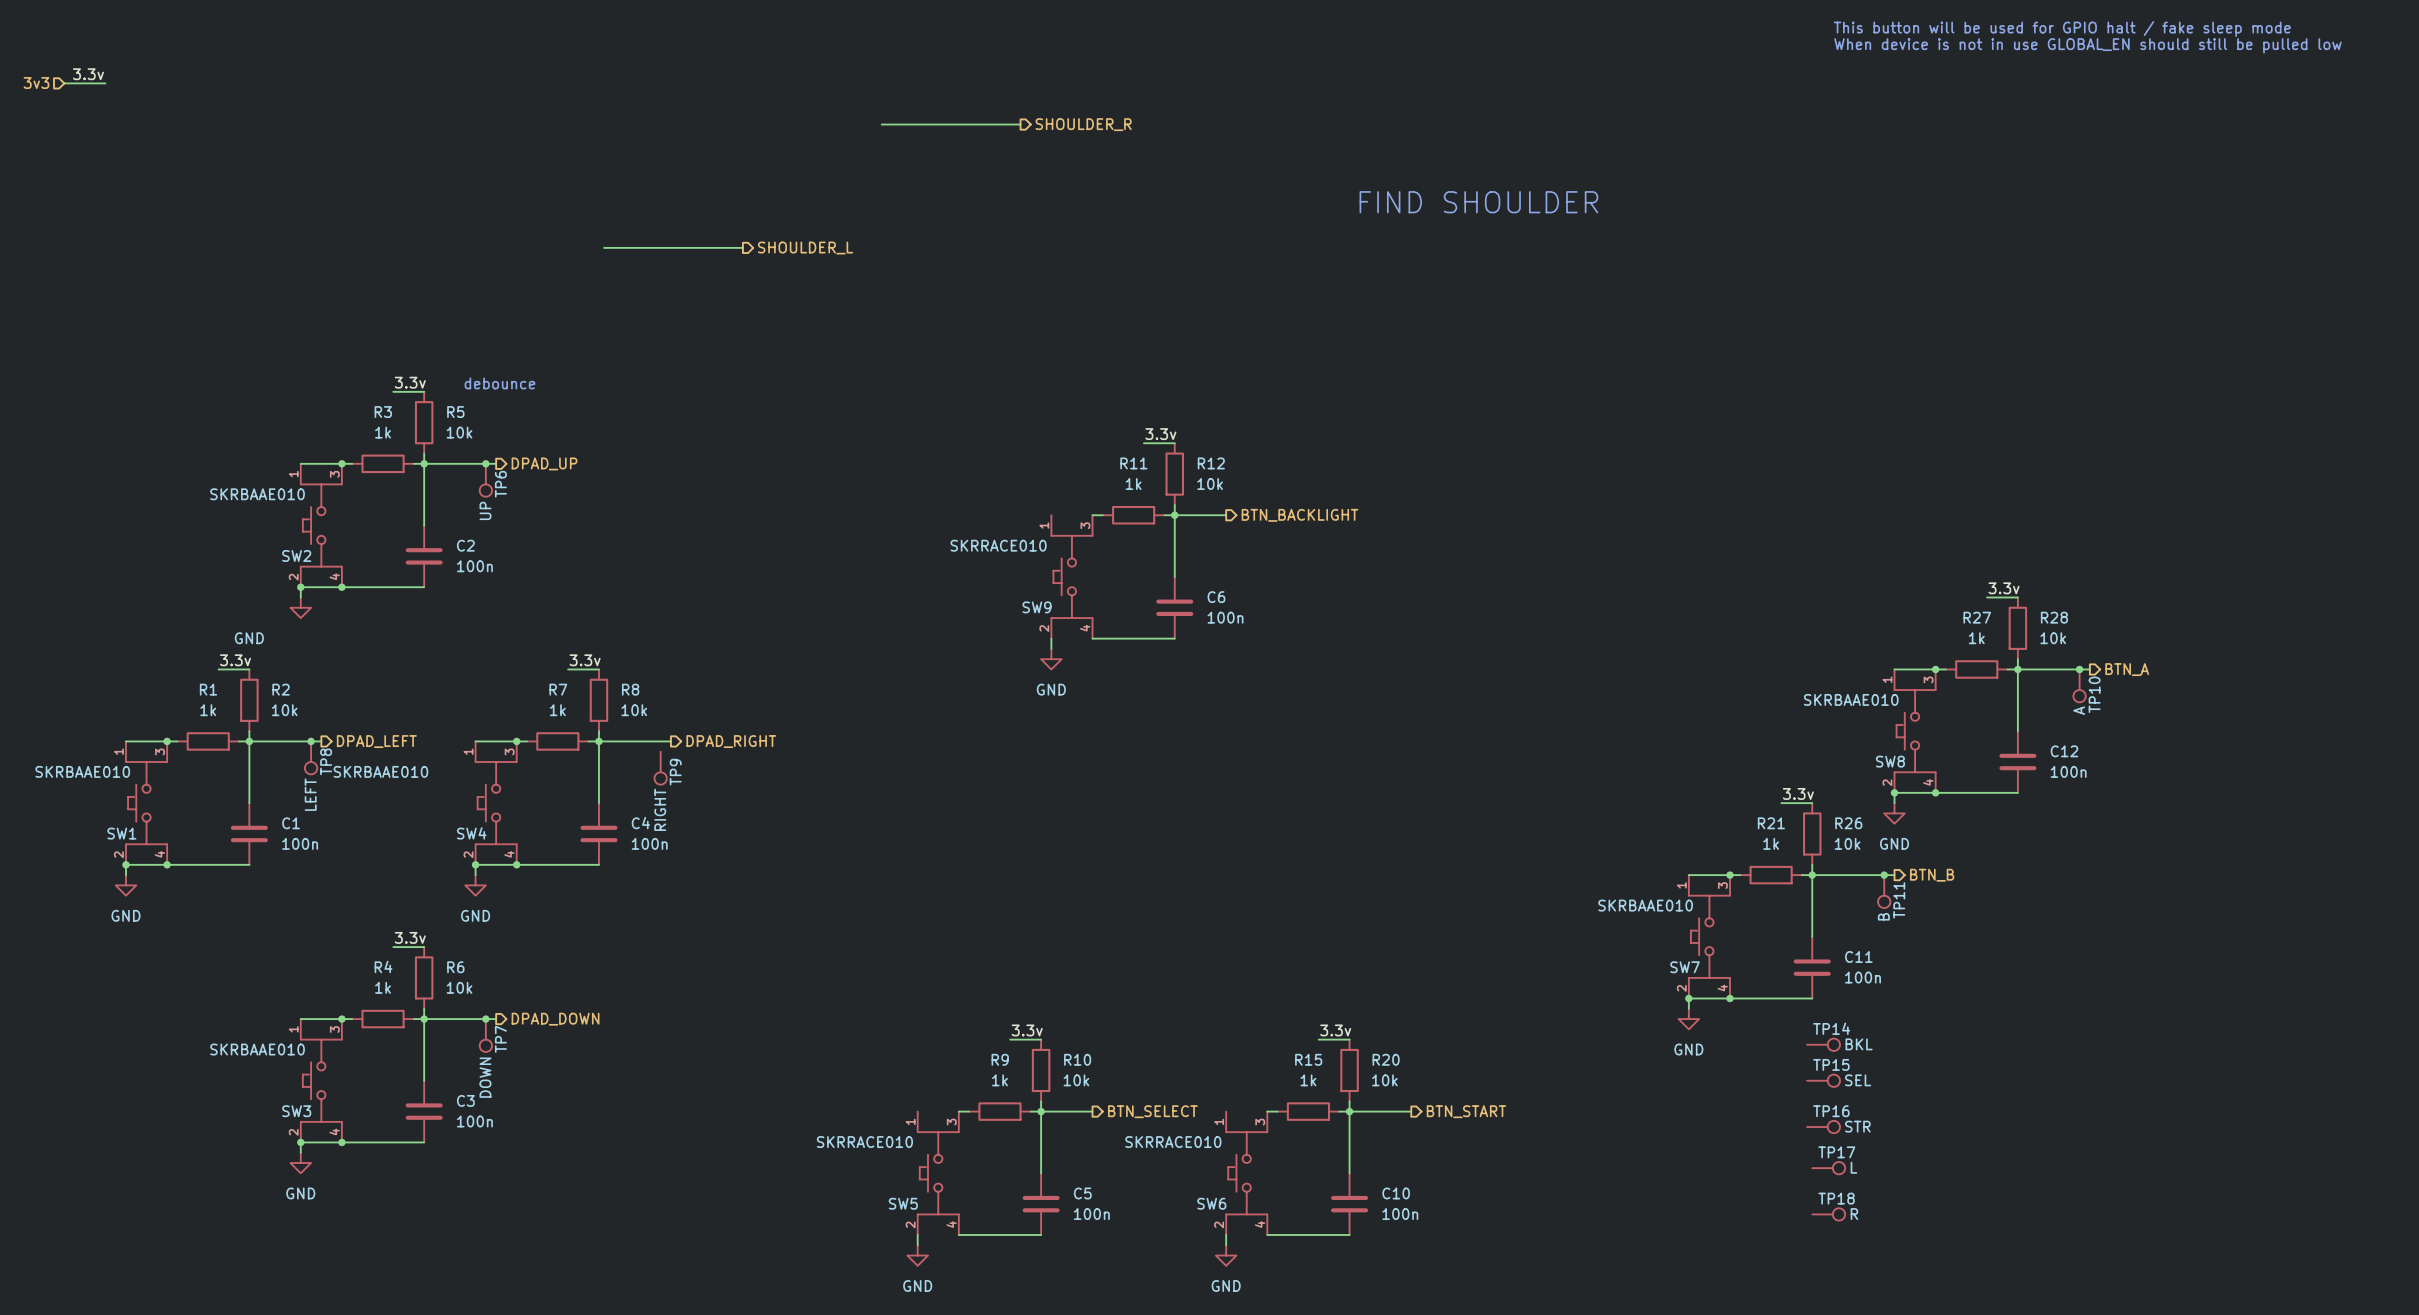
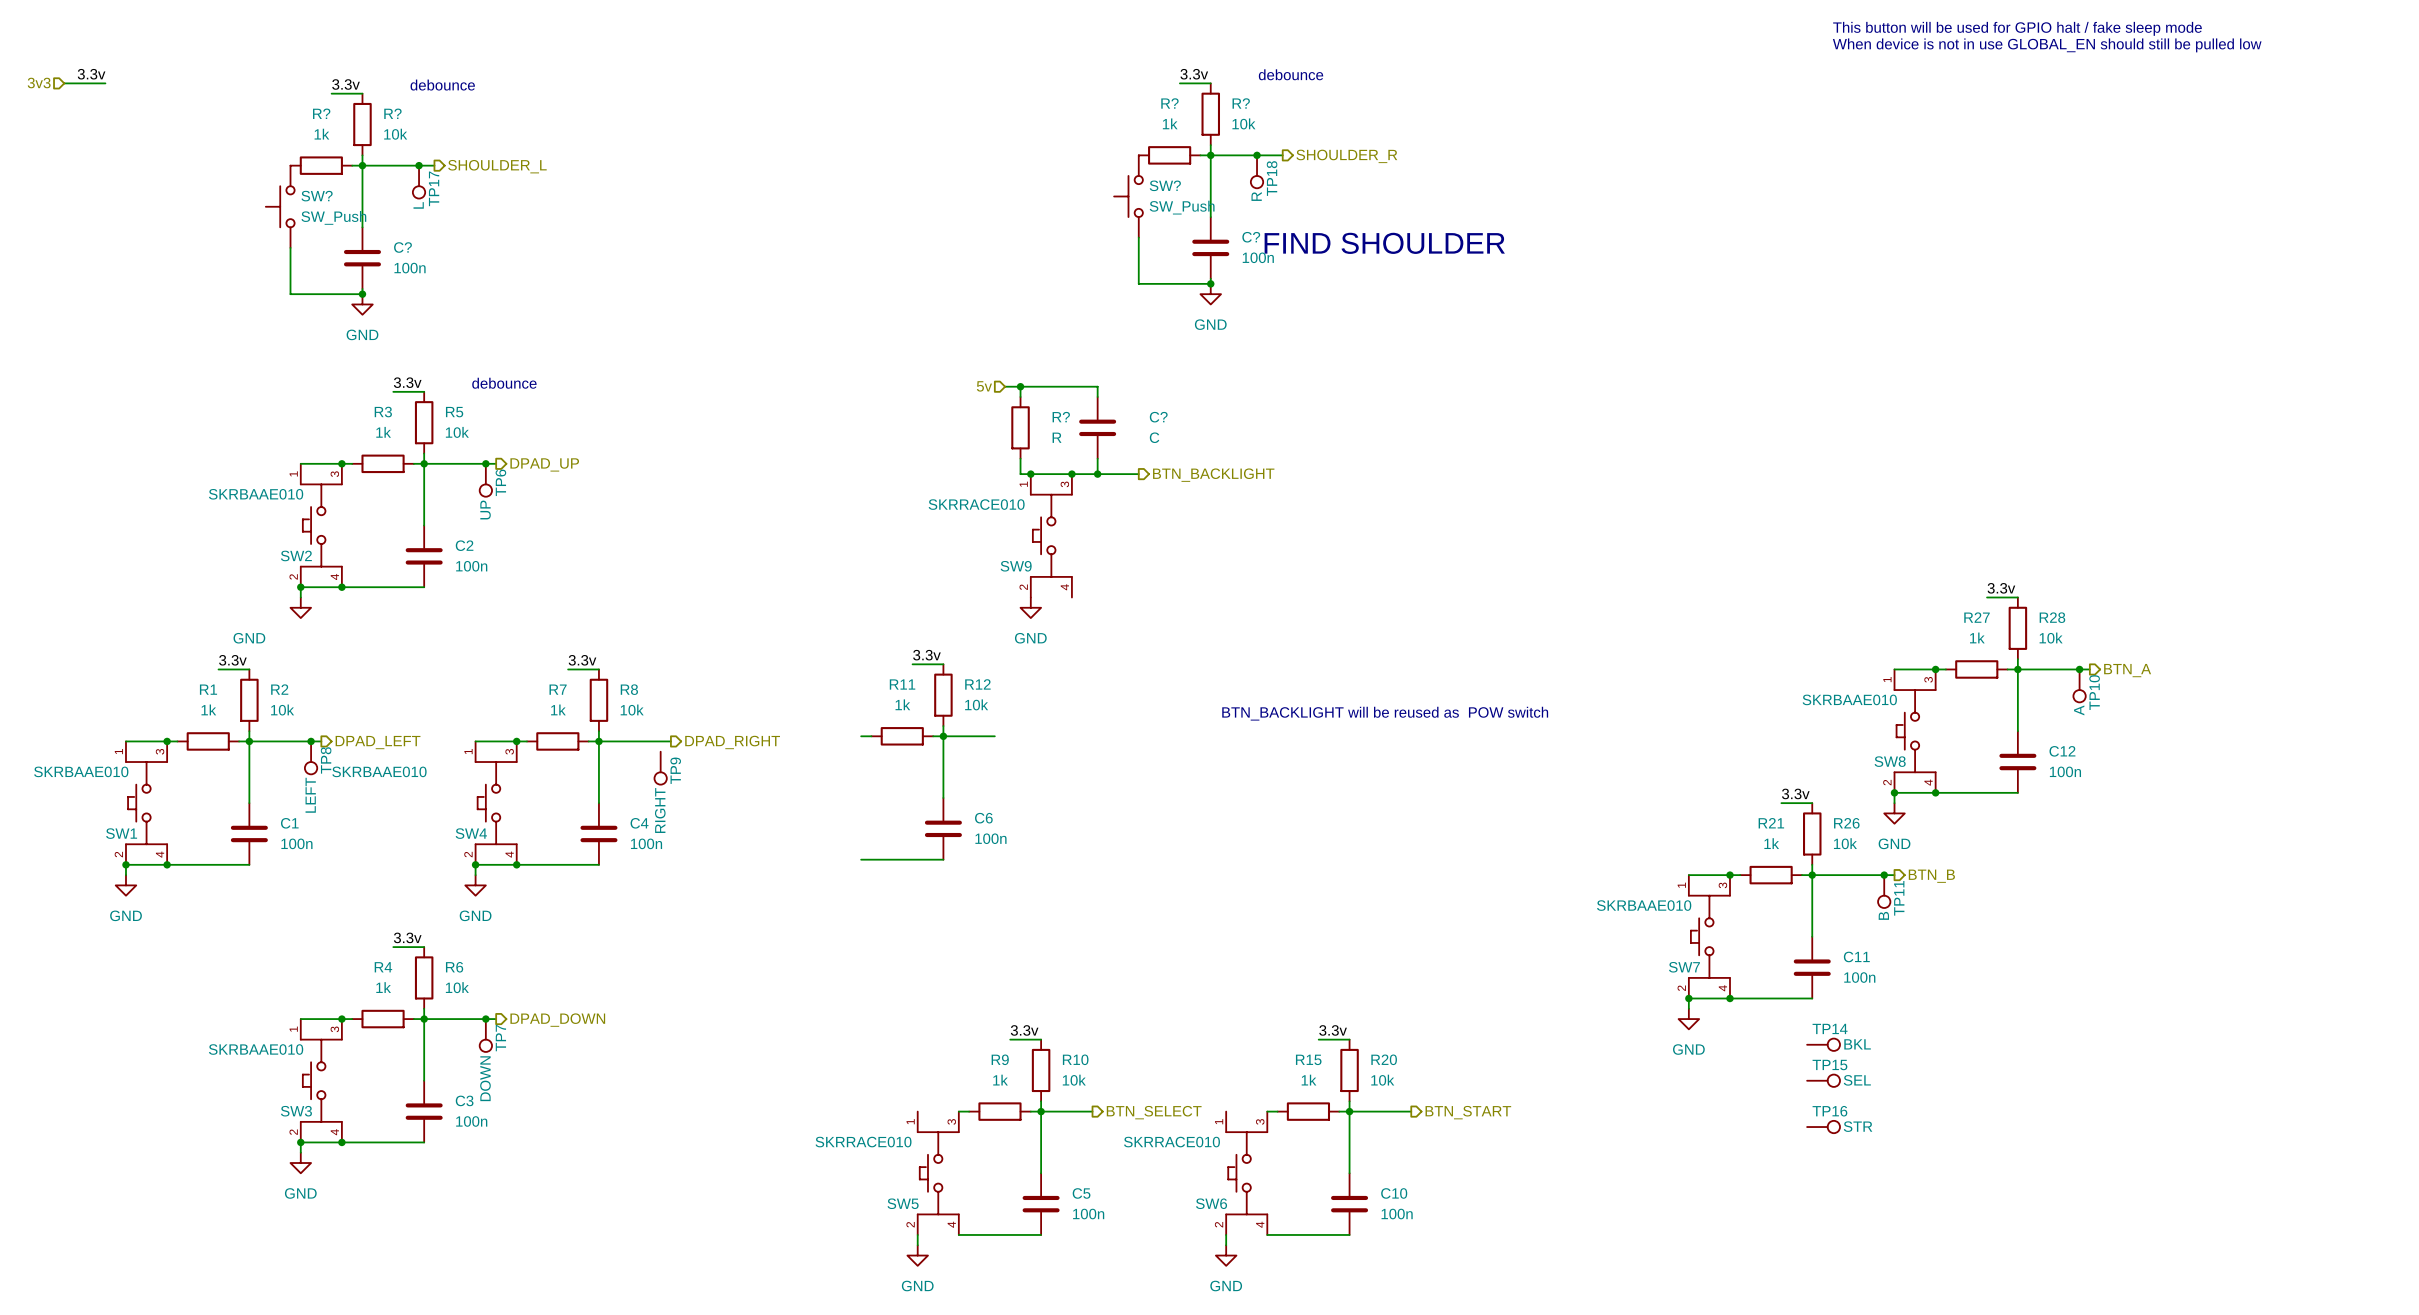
label: none -> 3.3v (1194, 74)
text: none -> debounce (1291, 74)
wire: none -> (1179, 83) (1210, 83)
label: none -> 3.3v (346, 84)
text: none -> debounce (442, 85)
wire: none -> (331, 93) (362, 93)
R?: none -> 10k (1210, 114)
R?: none -> 10k (362, 124)
wire: (881, 124) (1020, 124) -> none
hierarchical label: SHOULDER_R (1083, 124) -> none
wire: none -> (1210, 145) (1210, 217)
wire: none -> (362, 155) (362, 227)
R?: none -> 1k (1169, 155)
wire: none -> (1200, 155) (1282, 155)
junction: none -> (1210, 155)
junction: none -> (1257, 155)
hierarchical label: none -> SHOULDER_R (1346, 156)
R?: none -> 1k (321, 165)
wire: none -> (352, 165) (434, 165)
junction: none -> (362, 165)
junction: none -> (419, 165)
hierarchical label: none -> SHOULDER_L (497, 166)
SW?: none -> SW_Push (1128, 196)
text position: FIND SHOULDER (1478, 202) -> FIND SHOULDER (1384, 243)
SW?: none -> SW_Push (280, 206)
wire: none -> (1138, 237) (1138, 283) (1210, 283) (1210, 278)
wire: none -> (290, 247) (290, 294) (362, 294) (362, 289)
wire: (604, 247) (742, 247) -> none
C?: none -> 100n (1210, 247)
hierarchical label: SHOULDER_L (805, 248) -> none
C?: none -> 100n (362, 258)
junction: none -> (1210, 283)
junction: none -> (362, 294)
power symbol: none -> GND (1210, 294)
power symbol: none -> GND (362, 304)
hierarchical label: none -> 5v (984, 386)
wire: none -> (1005, 386) (1097, 386) (1097, 396)
wire: none -> (1020, 386) (1020, 396)
junction: none -> (1020, 386)
R?: none -> R (1020, 427)
C?: none -> C (1097, 427)
label: 3.3v (1160, 434) -> none
wire: (1143, 443) (1174, 443) -> none
wire: none -> (1020, 458) (1020, 474) (1138, 474)
wire: none -> (1097, 458) (1097, 474)
junction: none -> (1030, 474)
junction: none -> (1071, 474)
junction: none -> (1097, 474)
R12 position: (1174, 474) -> (943, 695)
wire: (1174, 504) (1174, 576) -> none
wire: (1092, 515) (1102, 515) -> none
R11 position: (1133, 515) -> (902, 736)
wire: (1164, 515) (1226, 515) -> none
junction: (1174, 515) -> none
hierarchical label position: BTN_BACKLIGHT (1300, 515) -> BTN_BACKLIGHT (1213, 475)
SW9 position: (1071, 576) -> (1051, 535)
C6 position: (1174, 607) -> (943, 828)
wire: (1051, 638) (1051, 648) -> none
wire: (1092, 638) (1174, 638) -> none
label: none -> 3.3v (926, 655)
power symbol position: GND (1051, 659) -> GND (1030, 607)
wire: none -> (912, 664) (943, 664)
text: none -> BTN_BACKLIGHT will be reused as POW switch (1385, 713)
wire: none -> (943, 726) (943, 797)
wire: none -> (861, 736) (871, 736)
wire: none -> (933, 736) (994, 736)
junction: none -> (943, 736)
wire: none -> (861, 859) (943, 859)
TP17 position: (1828, 1168) -> (419, 182)
TP17 rotation: 0° (1838, 1168) -> 90° clockwise (419, 192)
TP18 position: (1828, 1214) -> (1257, 171)
TP18 rotation: 0° (1838, 1214) -> 90° clockwise (1257, 182)

